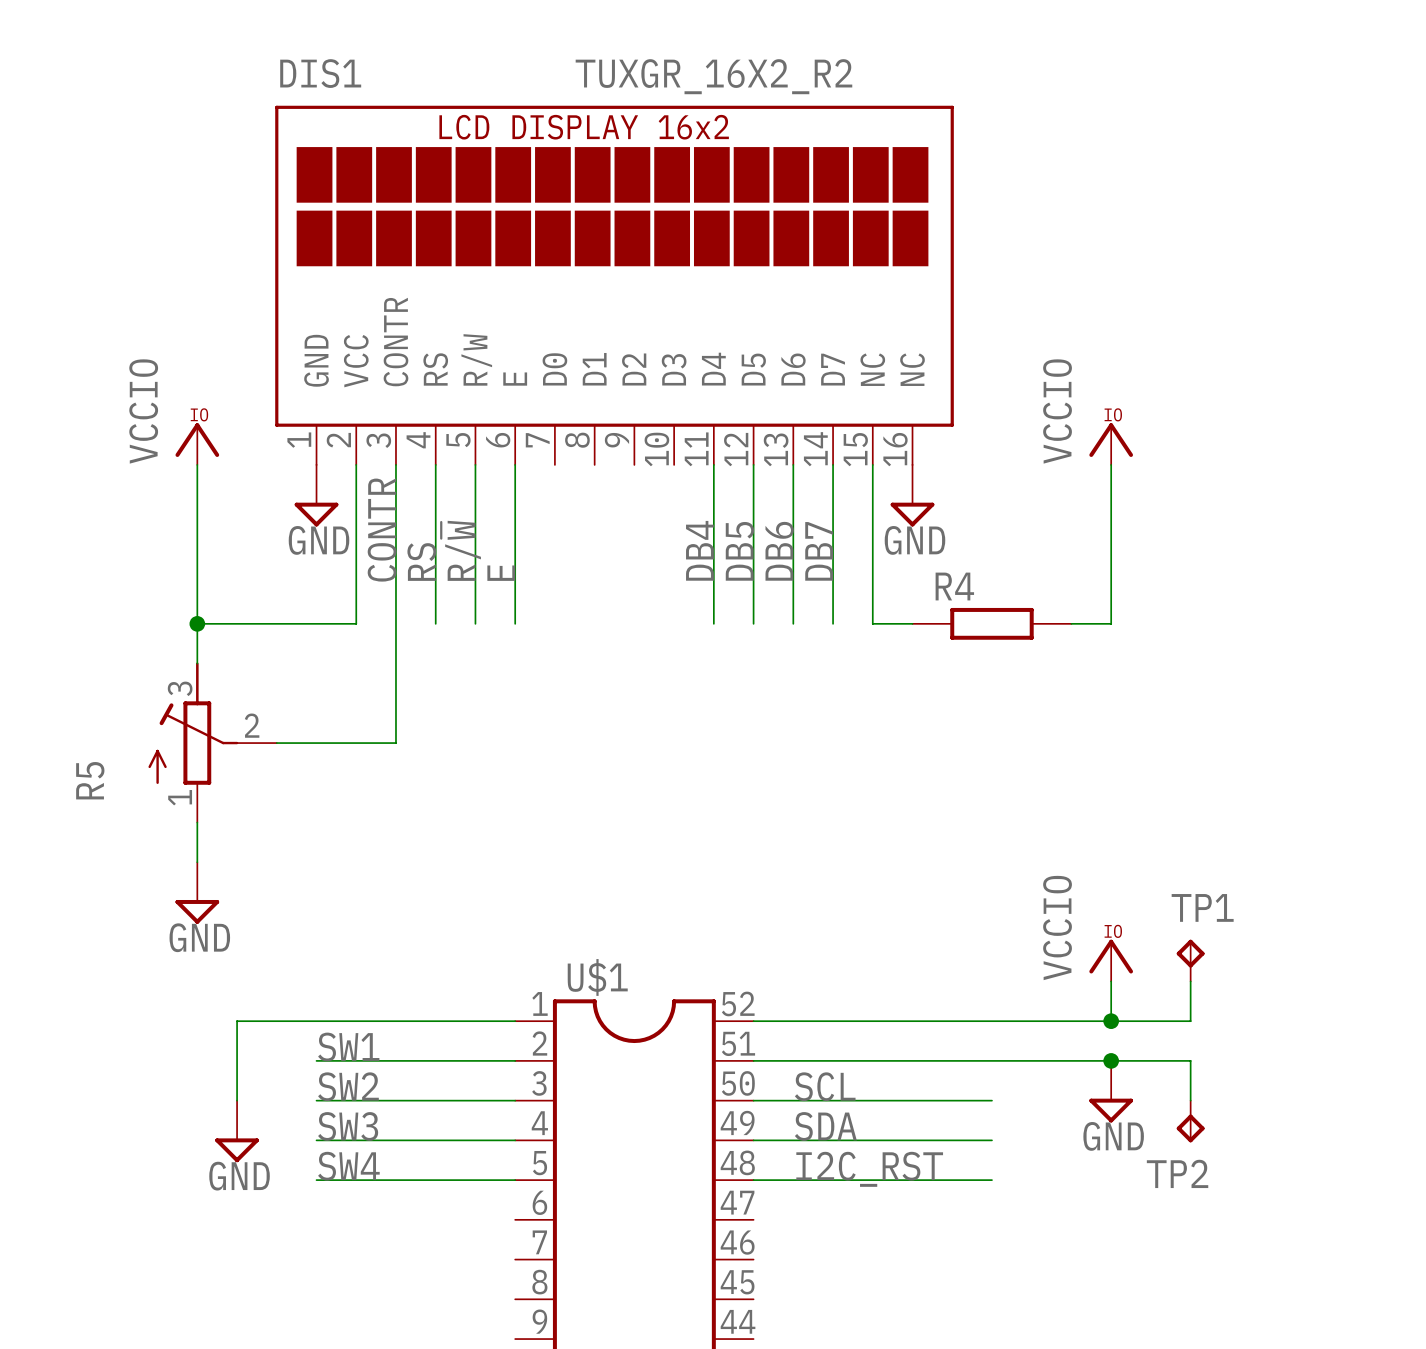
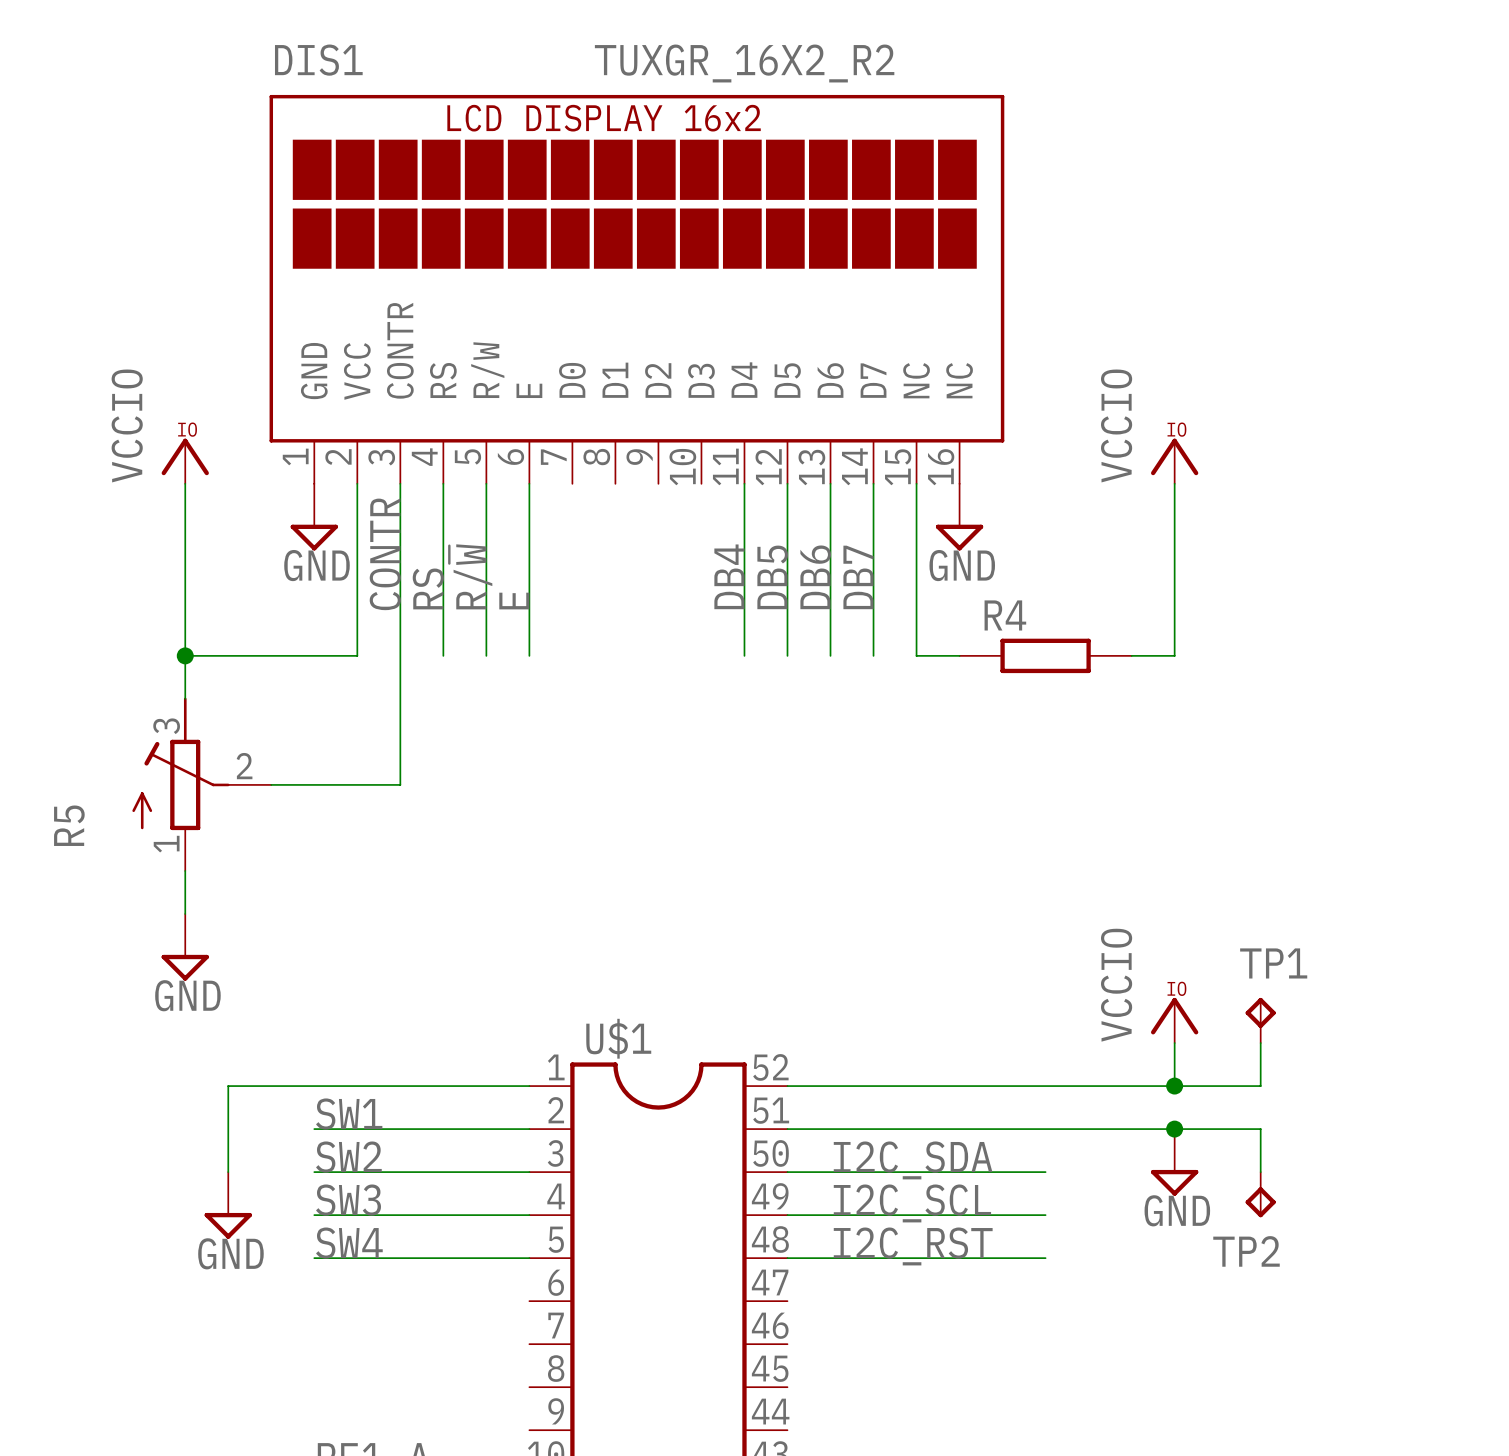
label: SCL (825, 1086) -> I2C_SDA (913, 1160)
label: SDA (825, 1126) -> I2C_SCL (912, 1203)

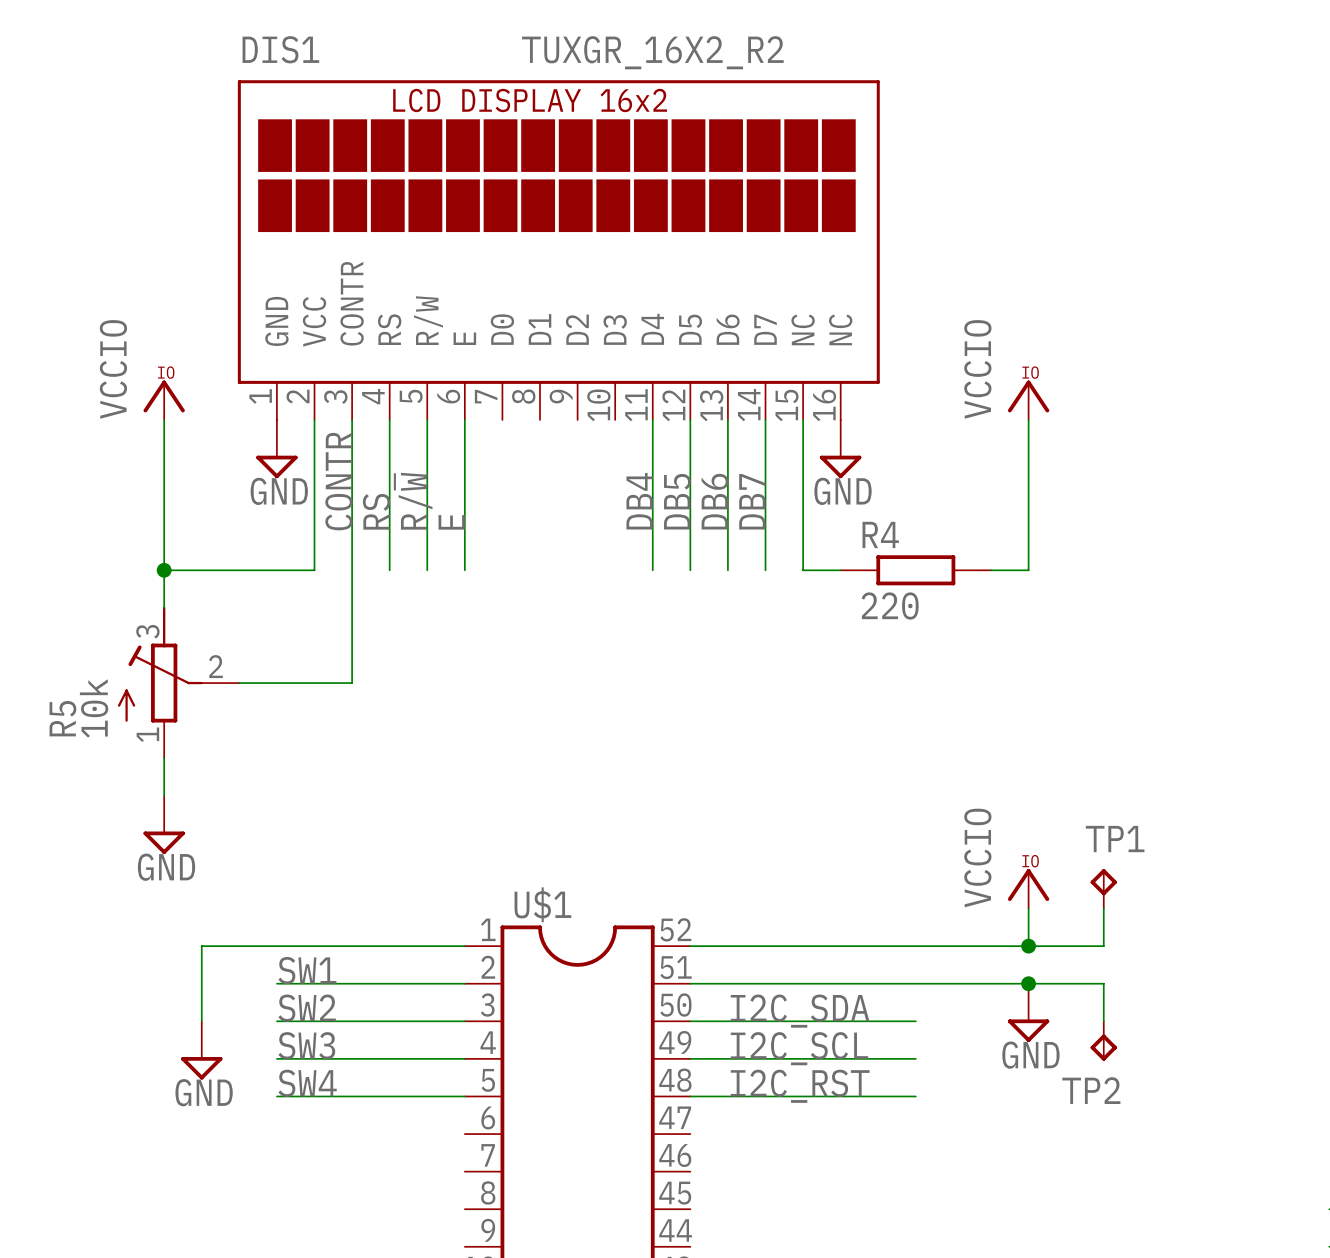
R4 value: none -> 220 (890, 606)
R5 value: none -> 10k (94, 708)

